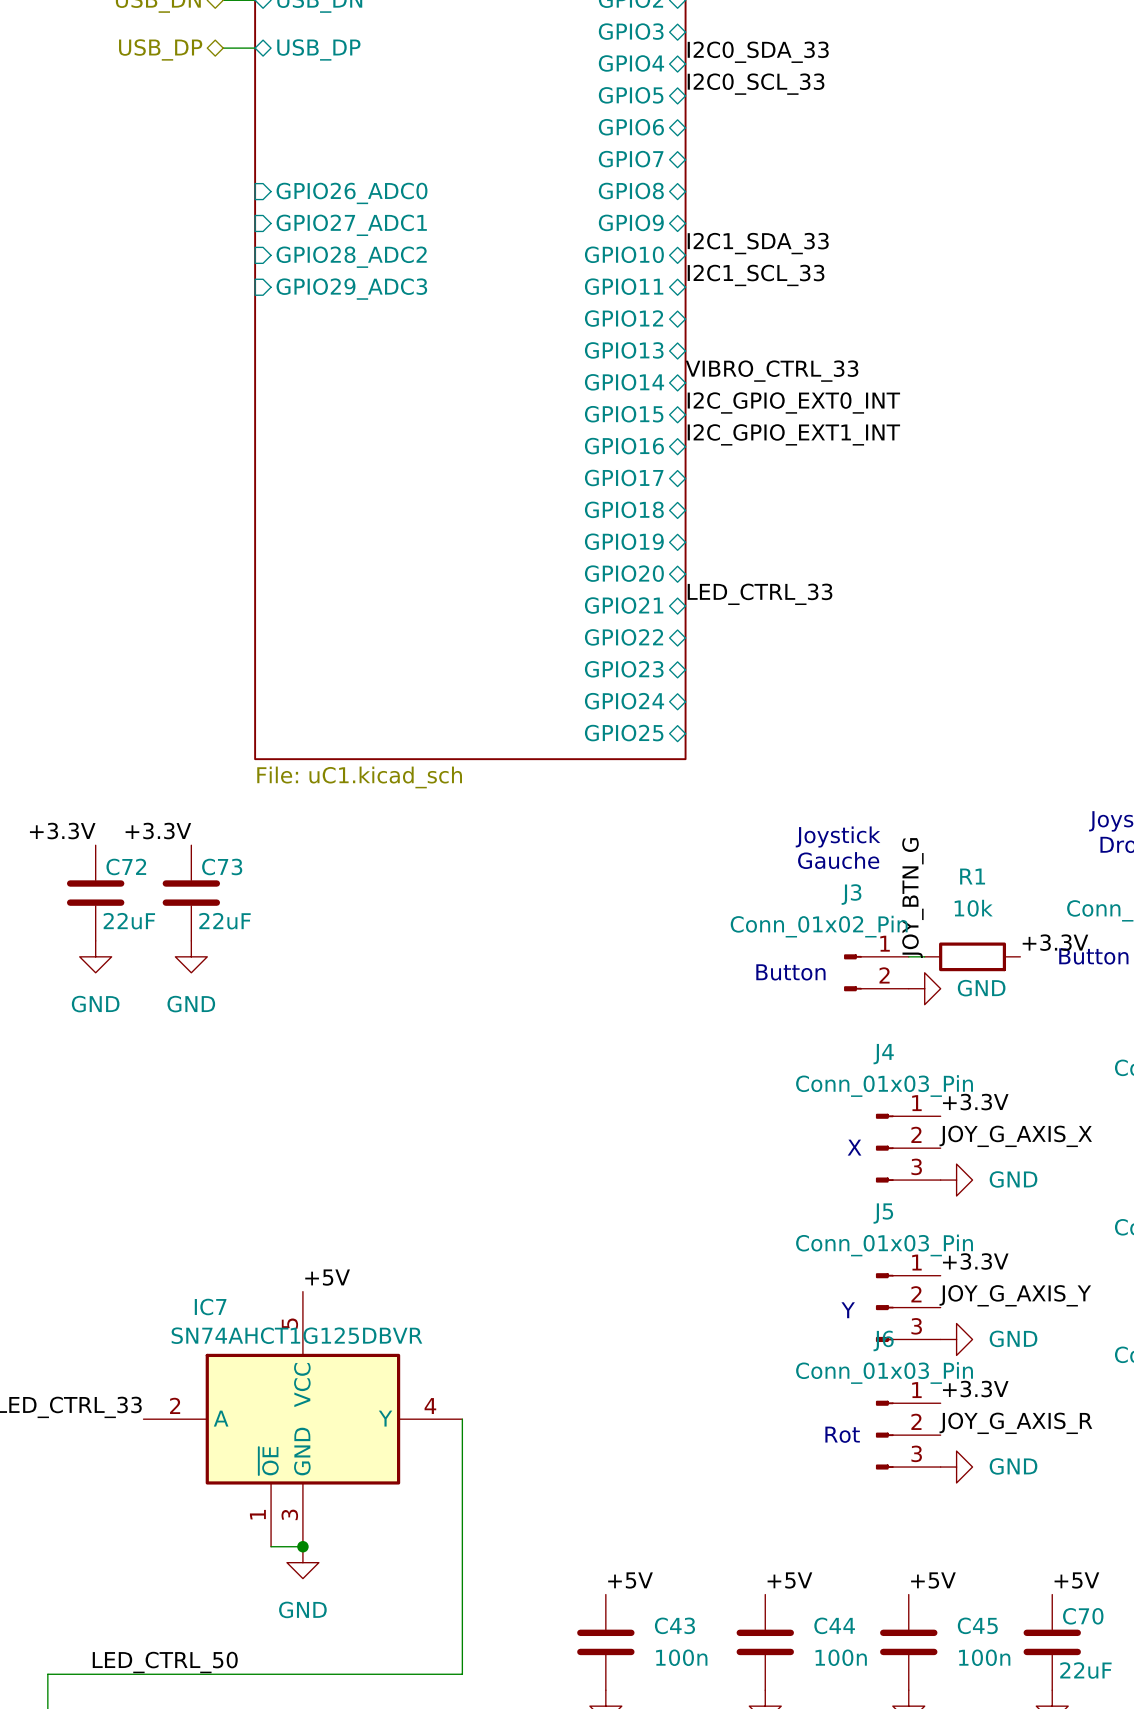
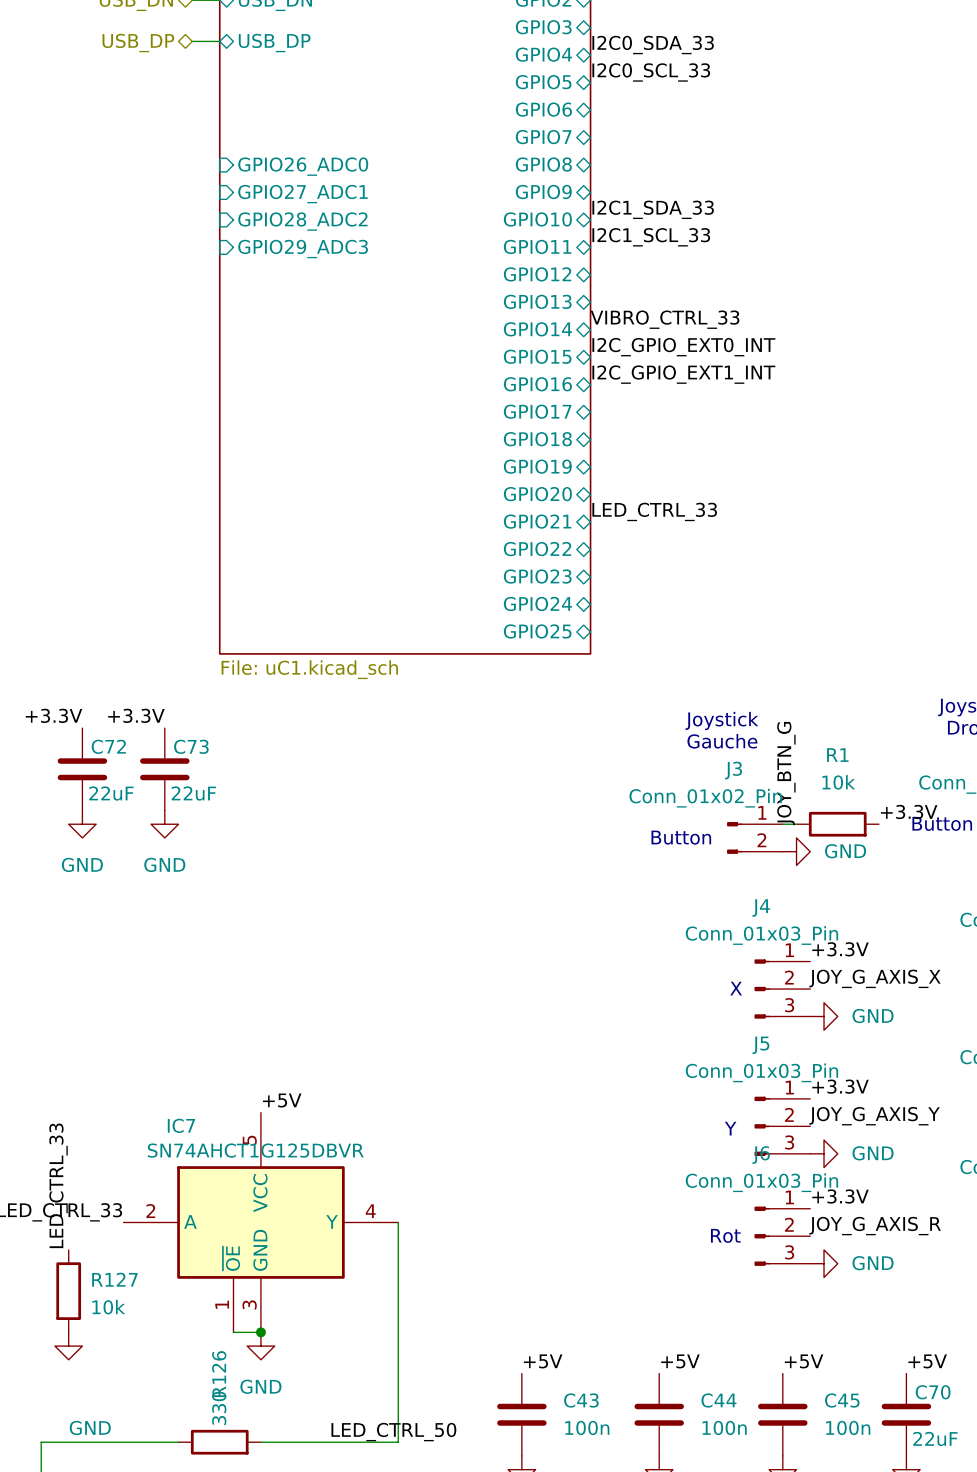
label: none -> LED_CTRL_33 (58, 1185)
R127: none -> 10k (68, 1291)
power symbol: none -> GND (68, 1346)
label position: LED_CTRL_50 (165, 1662) -> LED_CTRL_50 (393, 1432)
wire: (207, 1674) (302, 1674) -> none
R126: none -> 330 (219, 1442)

